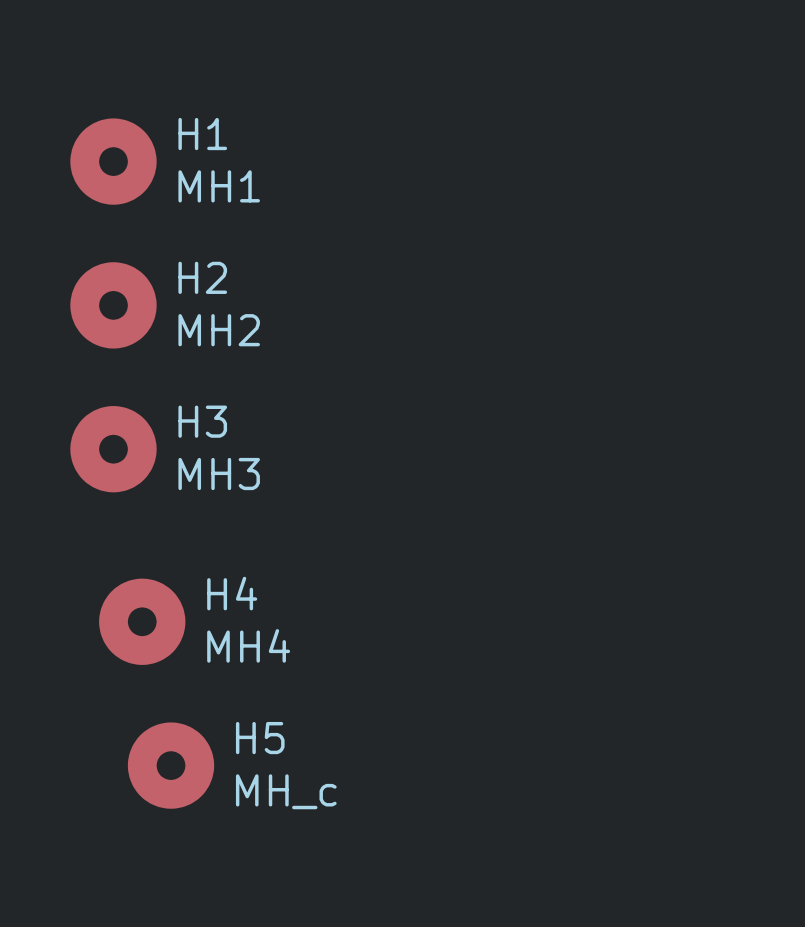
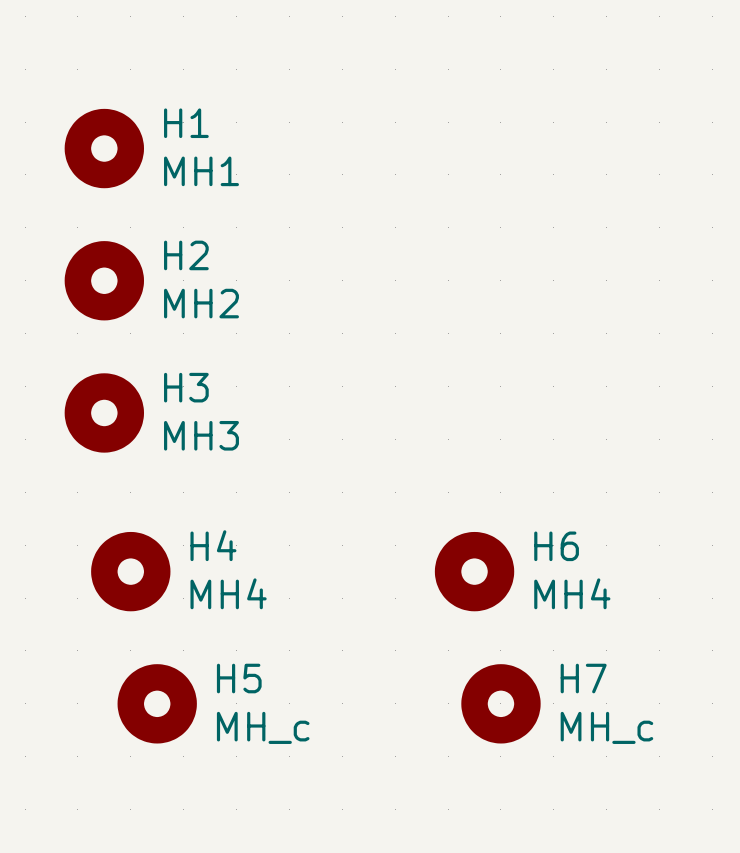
H6: none -> MH4 (474, 571)
H7: none -> MH_c (500, 703)

